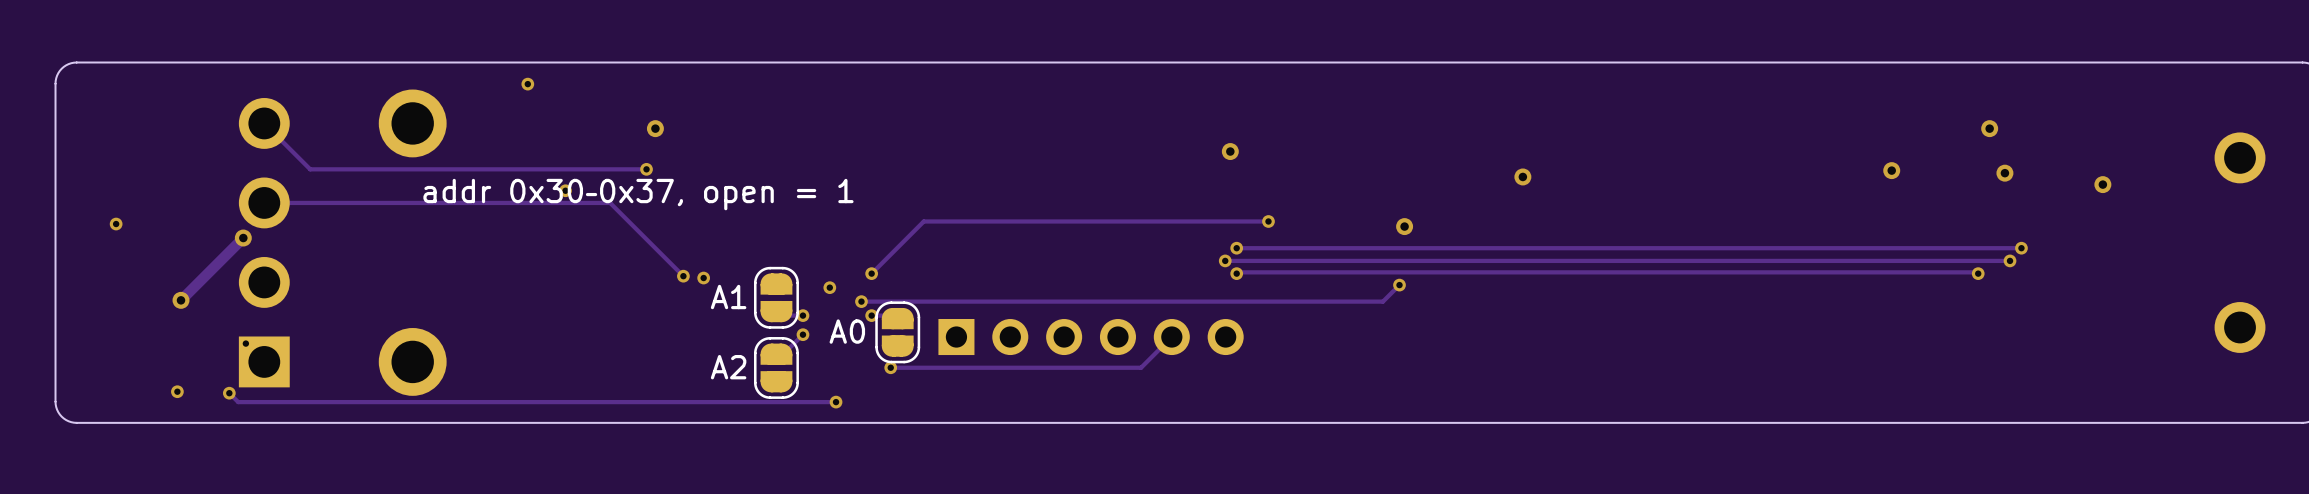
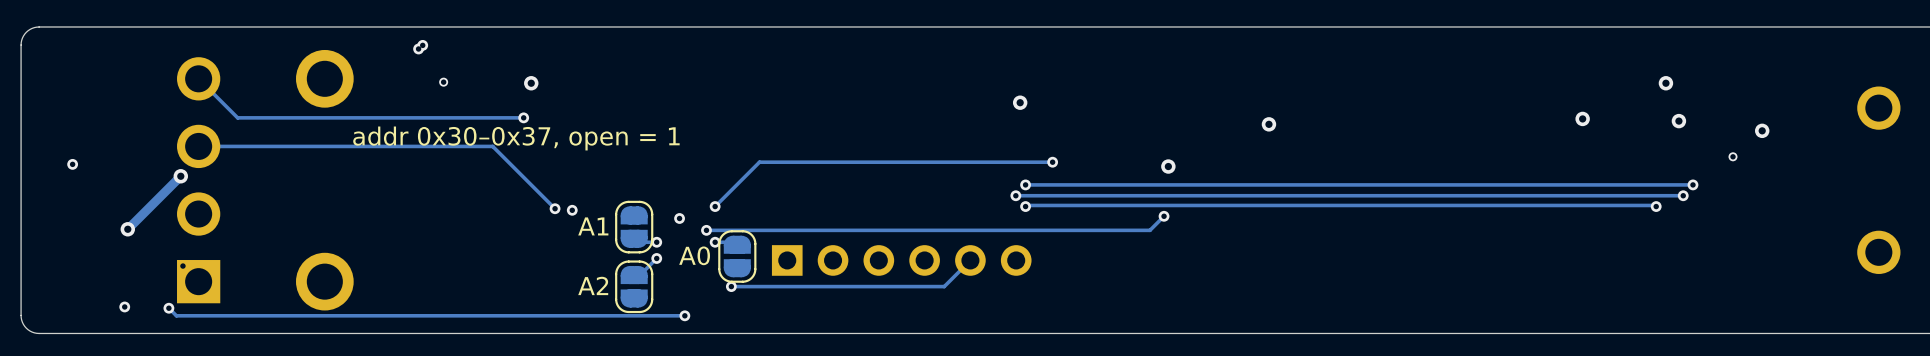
via: none -> (443, 82)
via position: (565, 190) -> (418, 48)
via: none -> (1733, 156)

